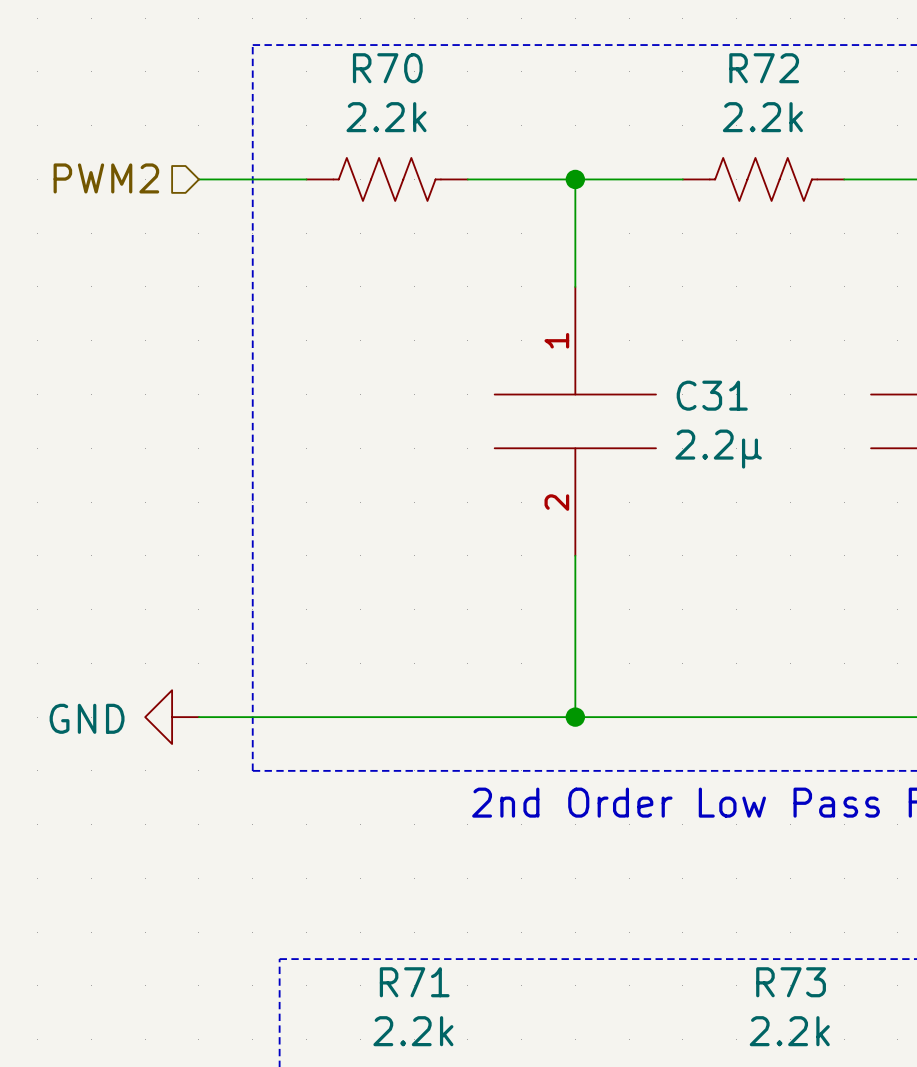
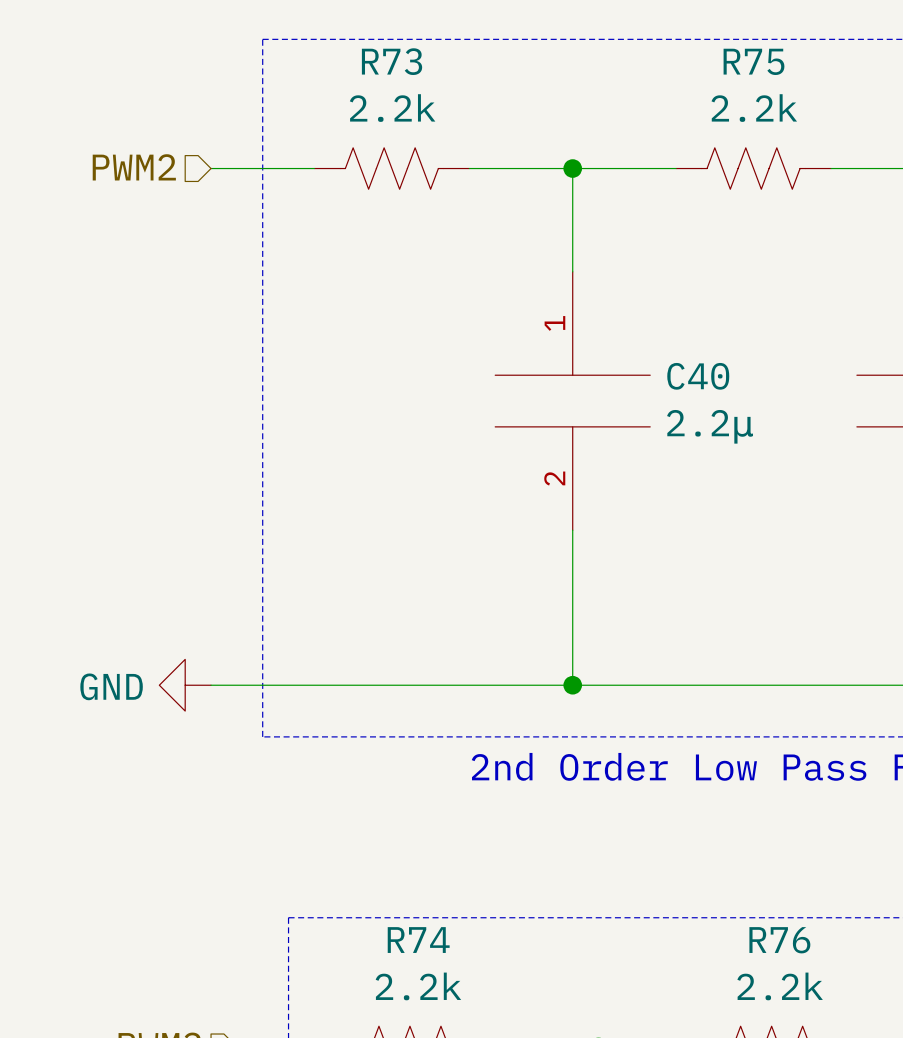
R70 name: R70 (387, 68) -> R73 (392, 61)
R72 name: R72 (764, 68) -> R75 (753, 61)
C31 name: C31 (712, 395) -> C40 (698, 376)
R71 name: R71 (414, 982) -> R74 (418, 940)
R73 name: R73 (791, 982) -> R76 (779, 940)

